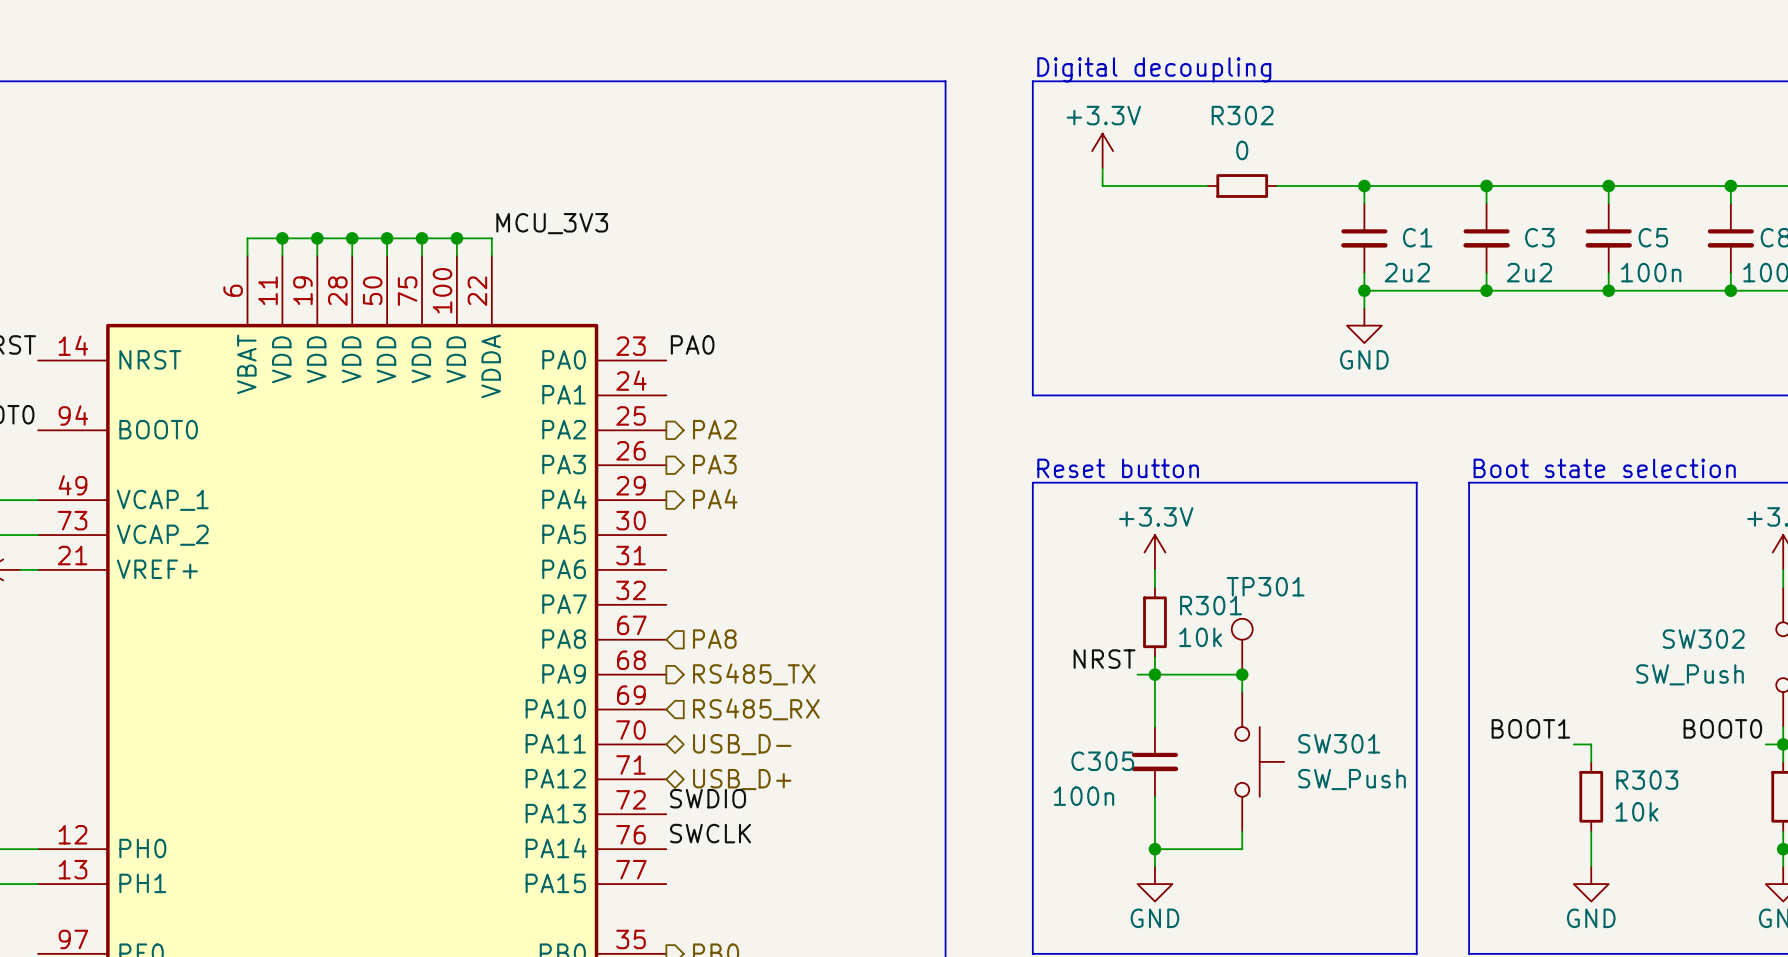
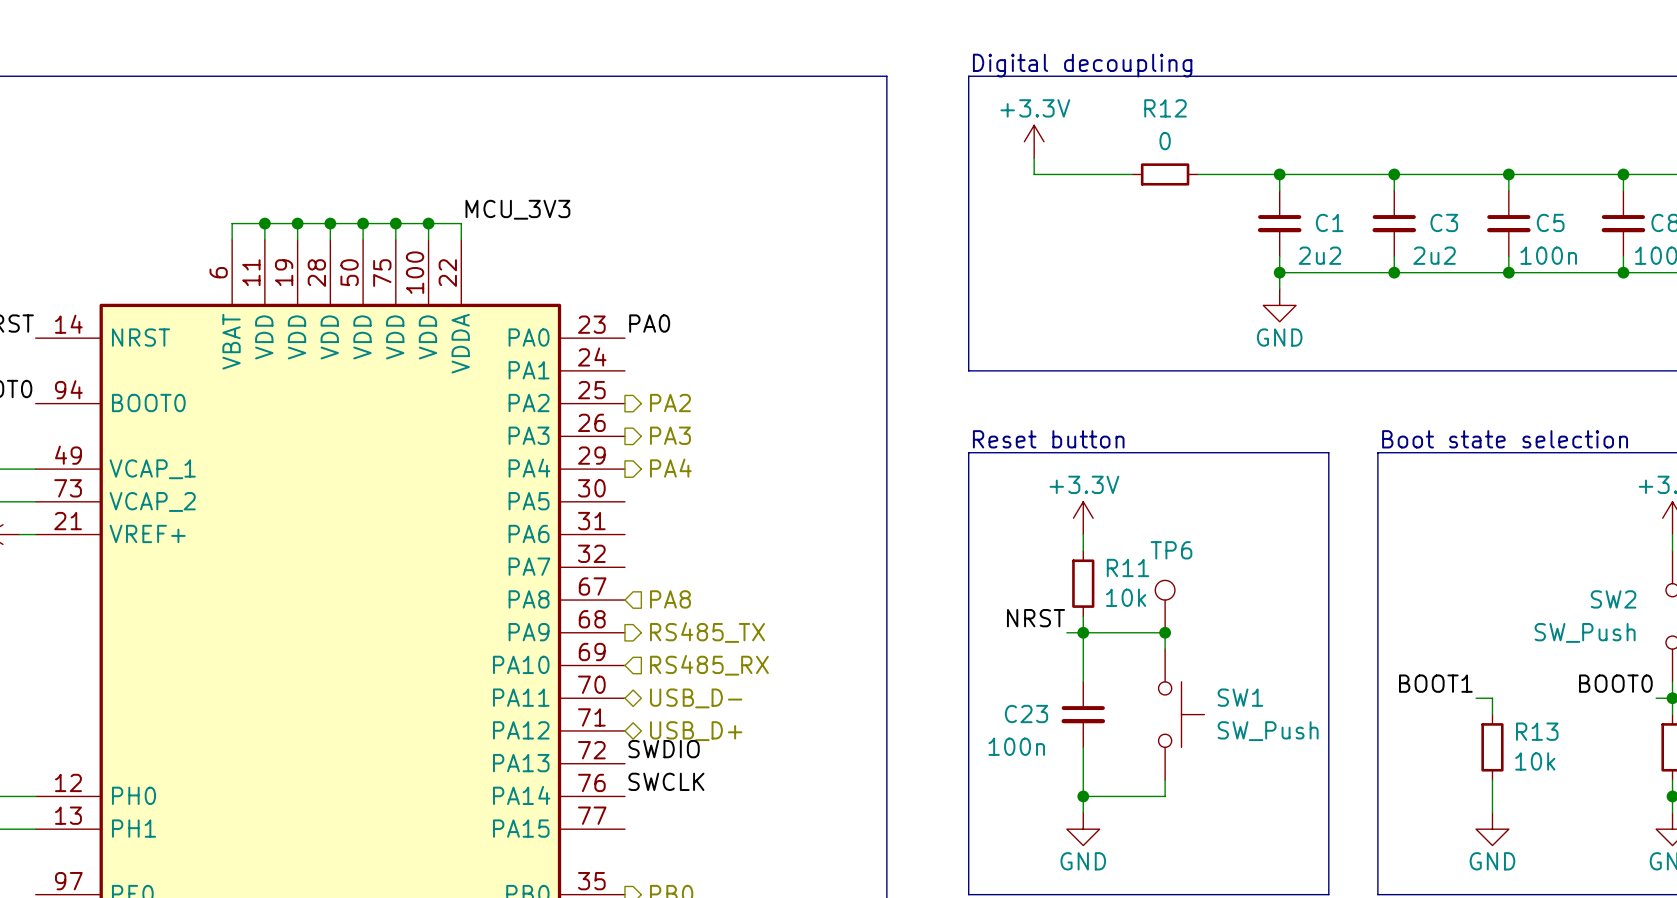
R302 name: R302 (1242, 115) -> R12 (1165, 108)
TP301 name: TP301 (1265, 586) -> TP6 (1171, 550)
R301 name: R301 (1211, 605) -> R11 (1128, 567)
SW302 name: SW302 (1703, 639) -> SW2 (1613, 599)
SW301 name: SW301 (1339, 743) -> SW1 (1240, 697)
C305 name: C305 (1102, 761) -> C23 (1026, 713)
R303 name: R303 (1647, 780) -> R13 (1537, 731)

